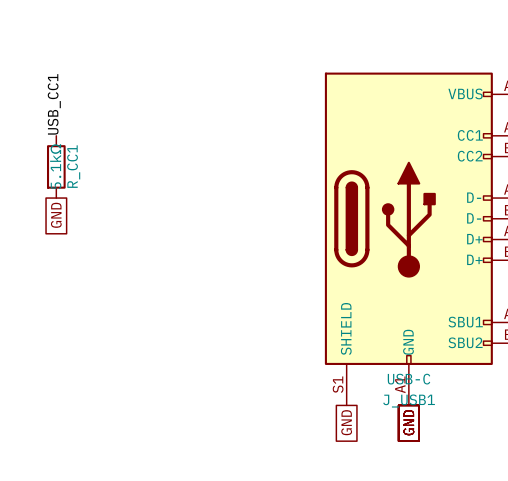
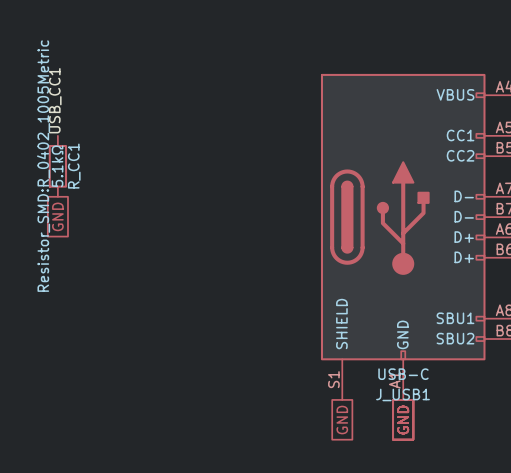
R_CC1 text: none -> Resistor_SMD:R_0402_1005Metric (43, 166)

